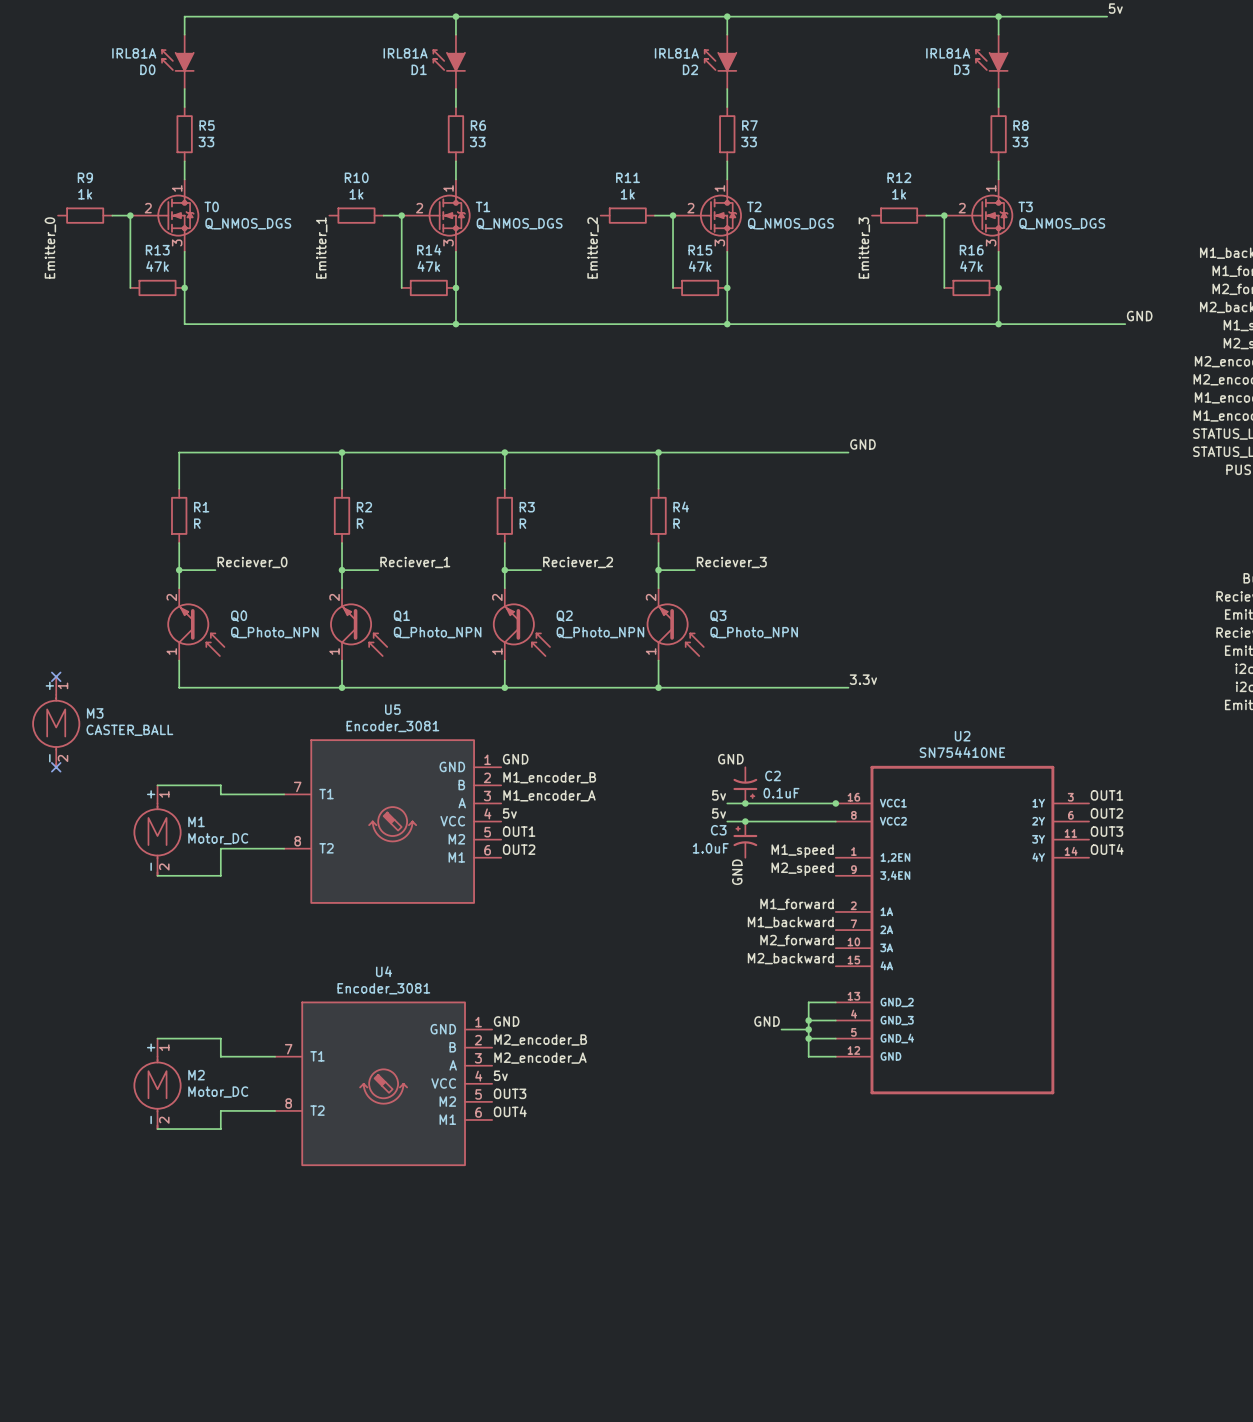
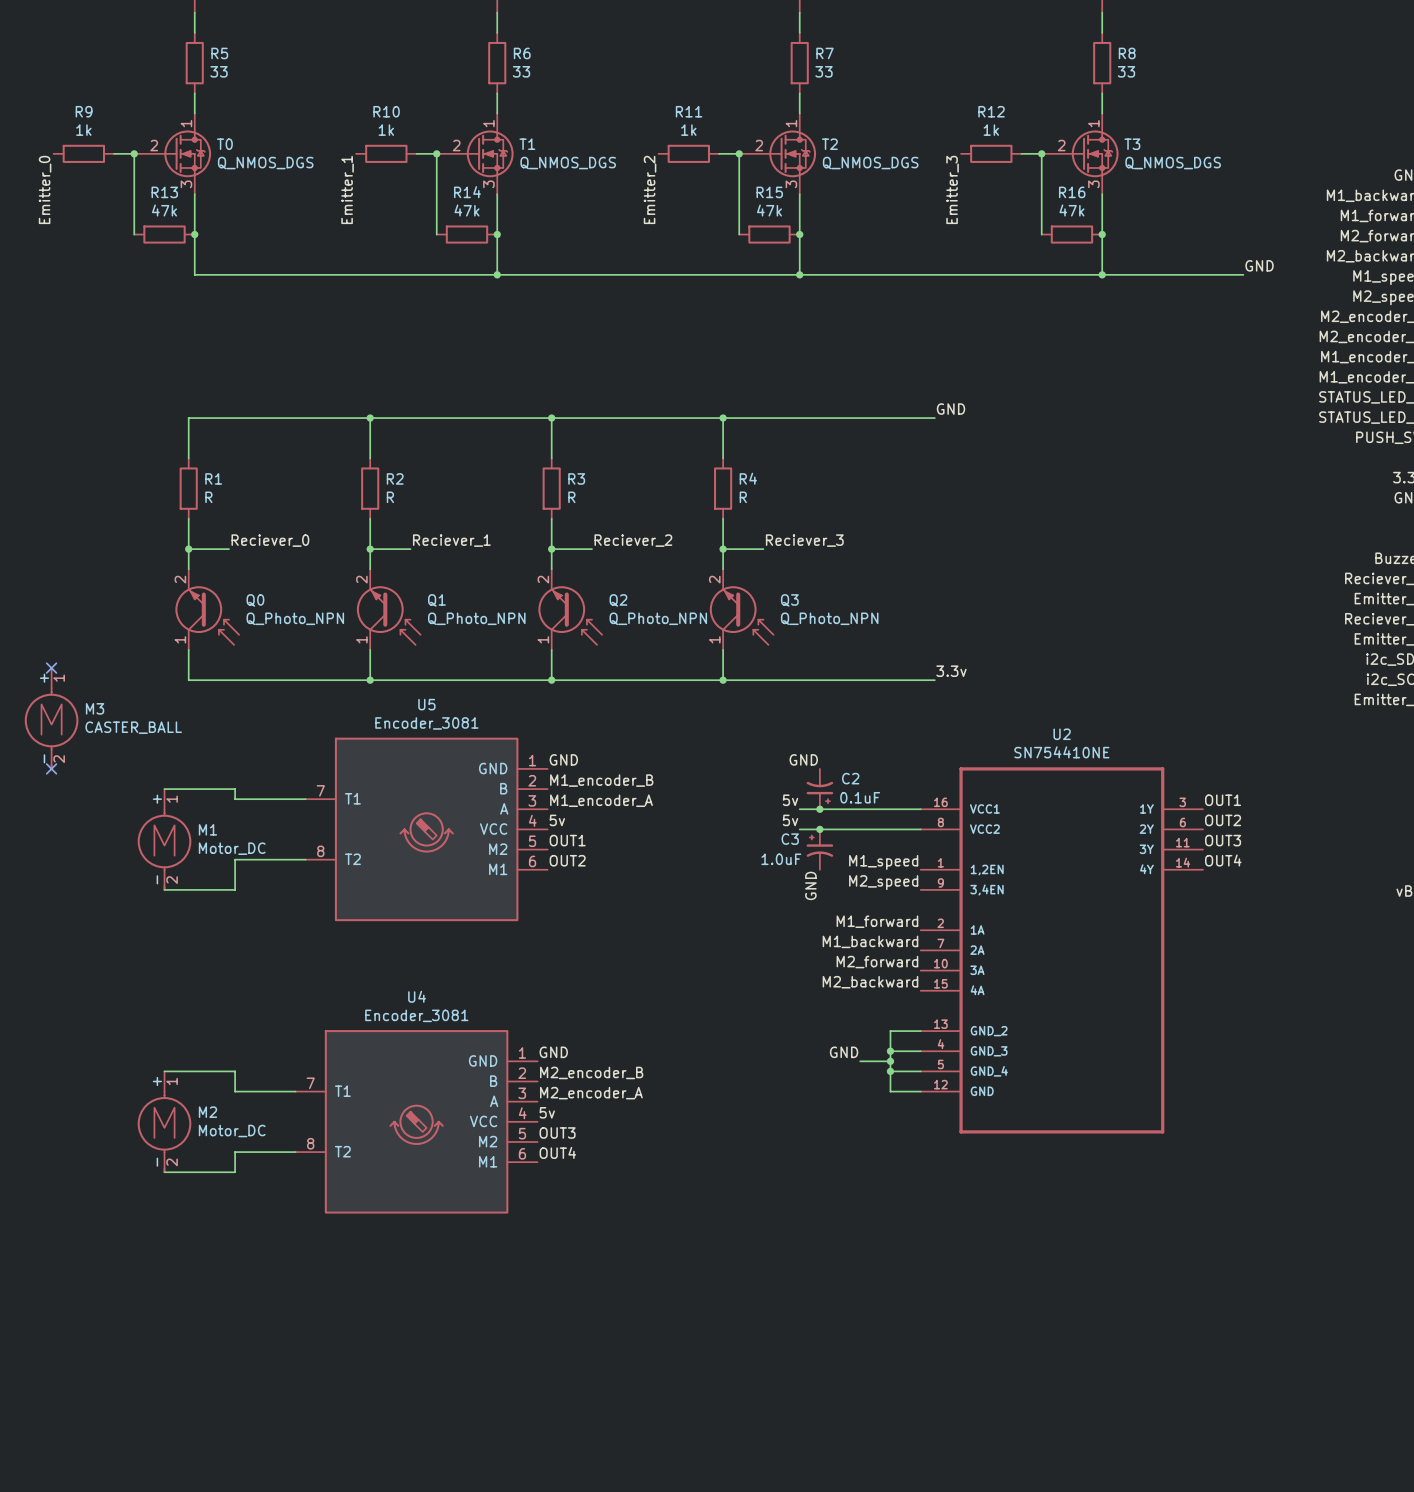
junction: (835, 803) -> none

